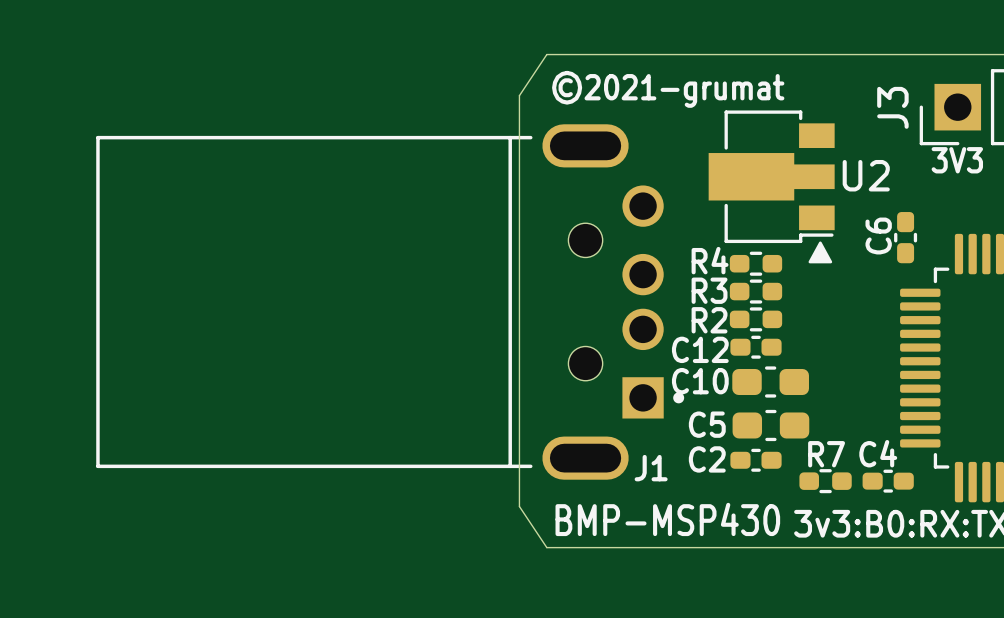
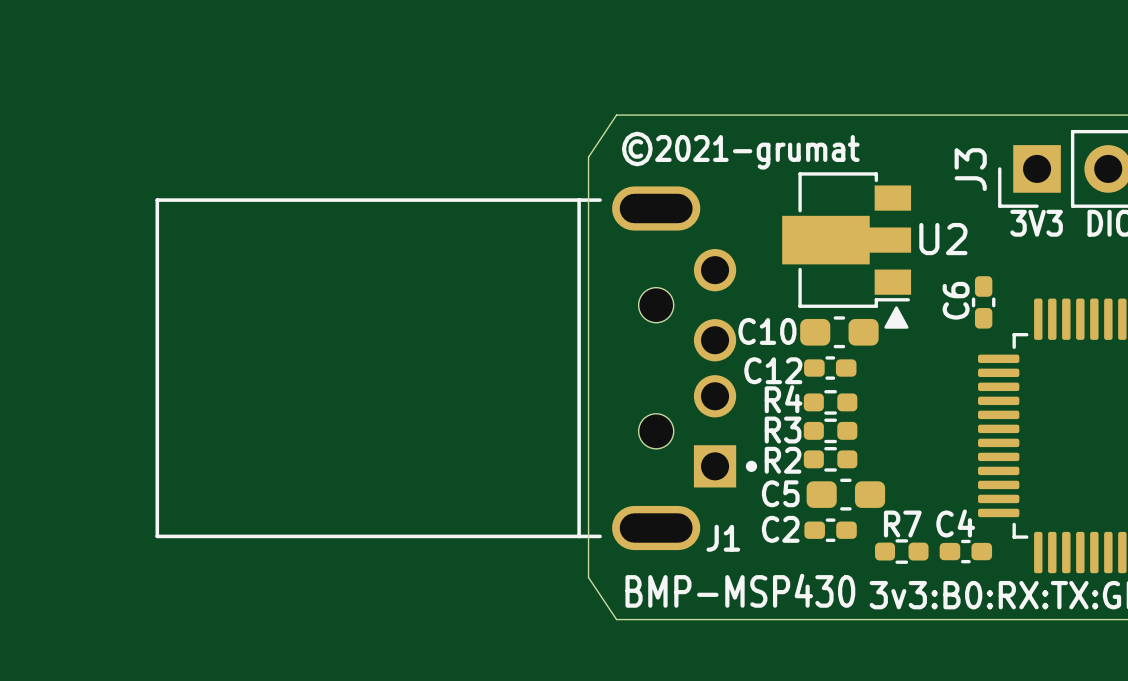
R4 position: (756, 263) -> (830, 402)
R3 position: (756, 291) -> (830, 430)
R2 position: (756, 319) -> (830, 459)
C12 position: (756, 347) -> (830, 368)
C10 position: (770, 382) -> (839, 332)

